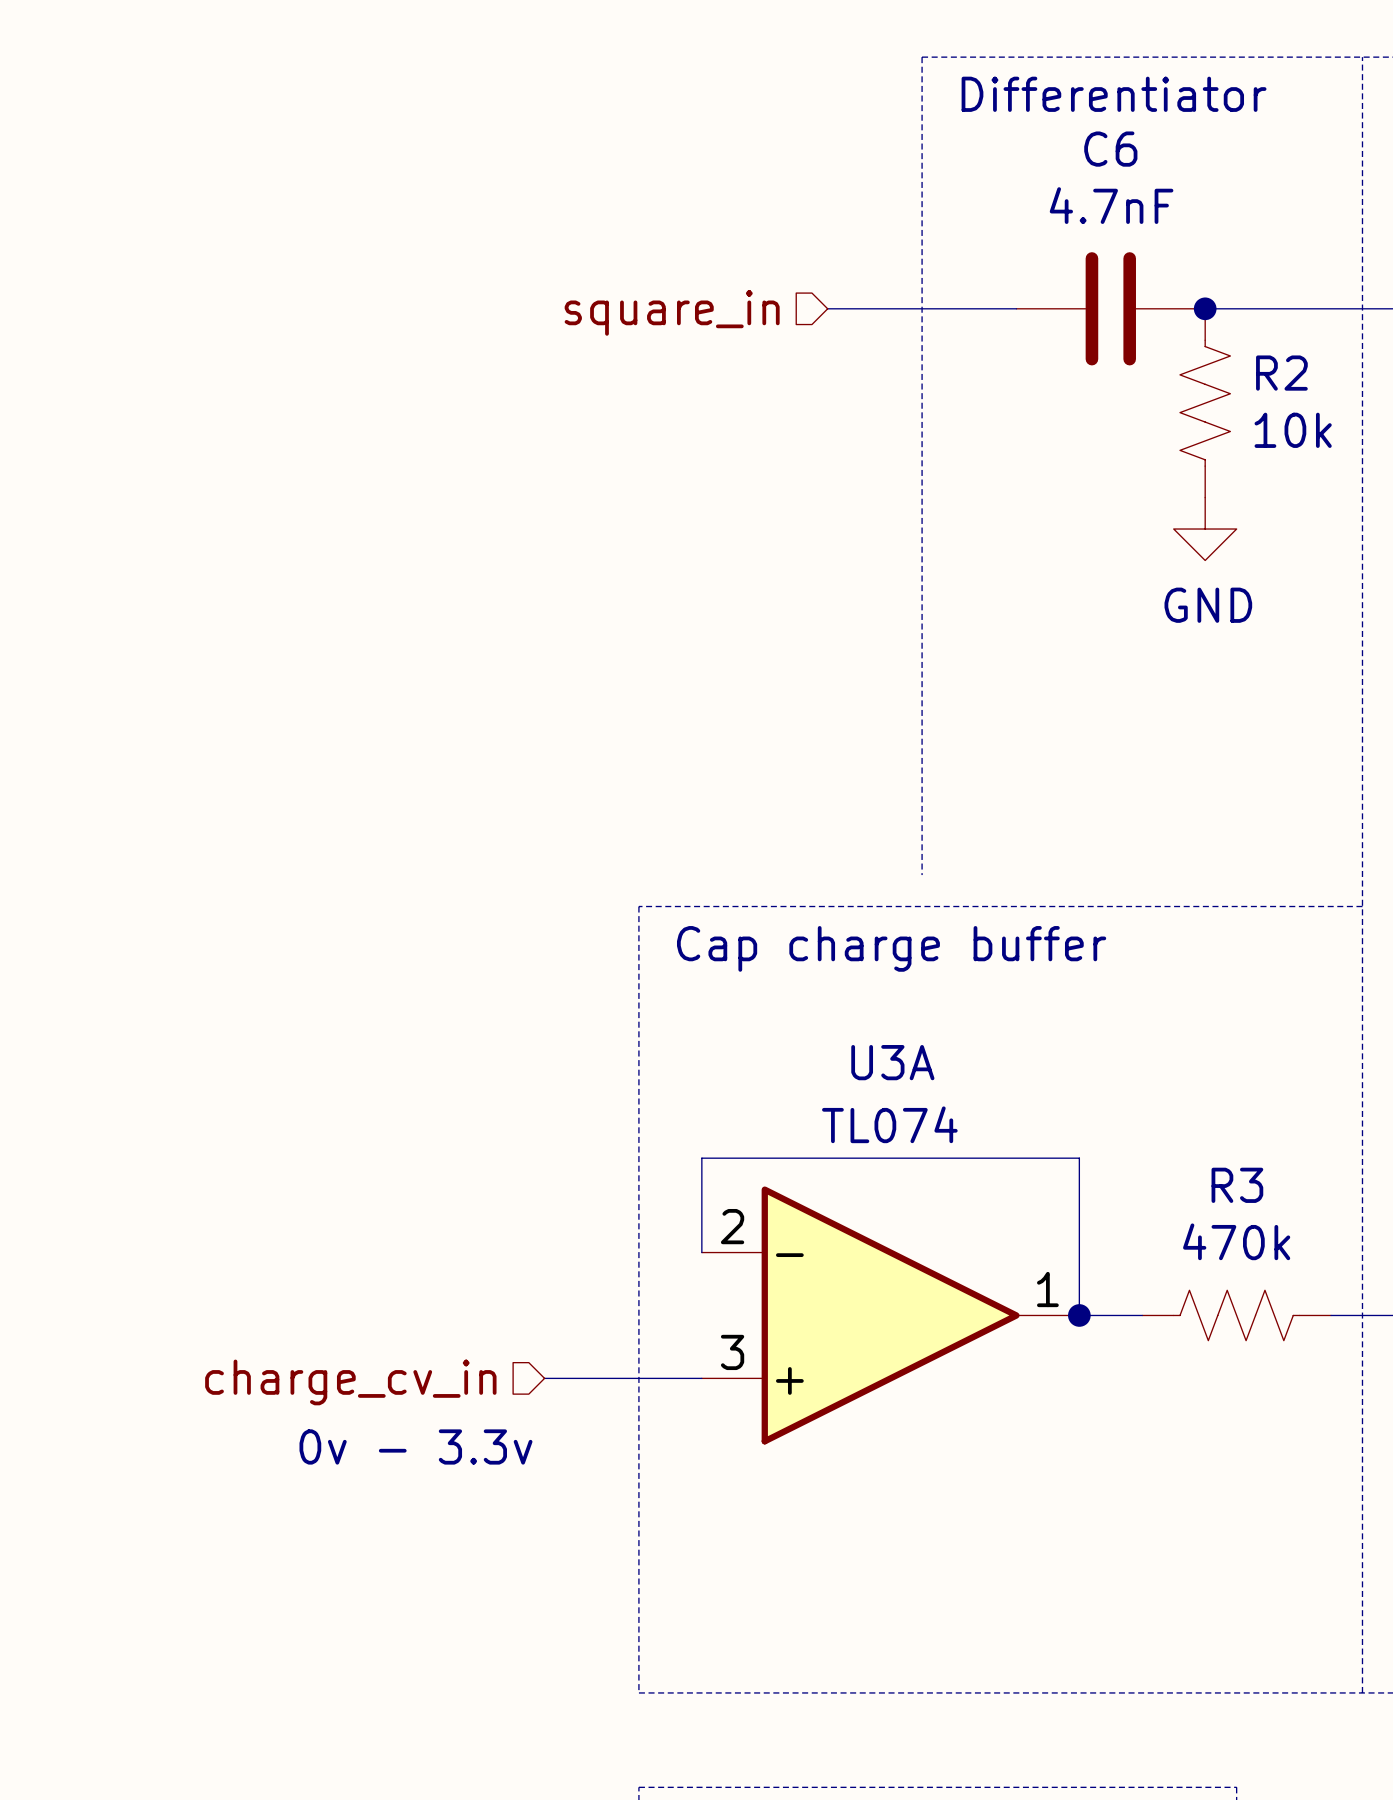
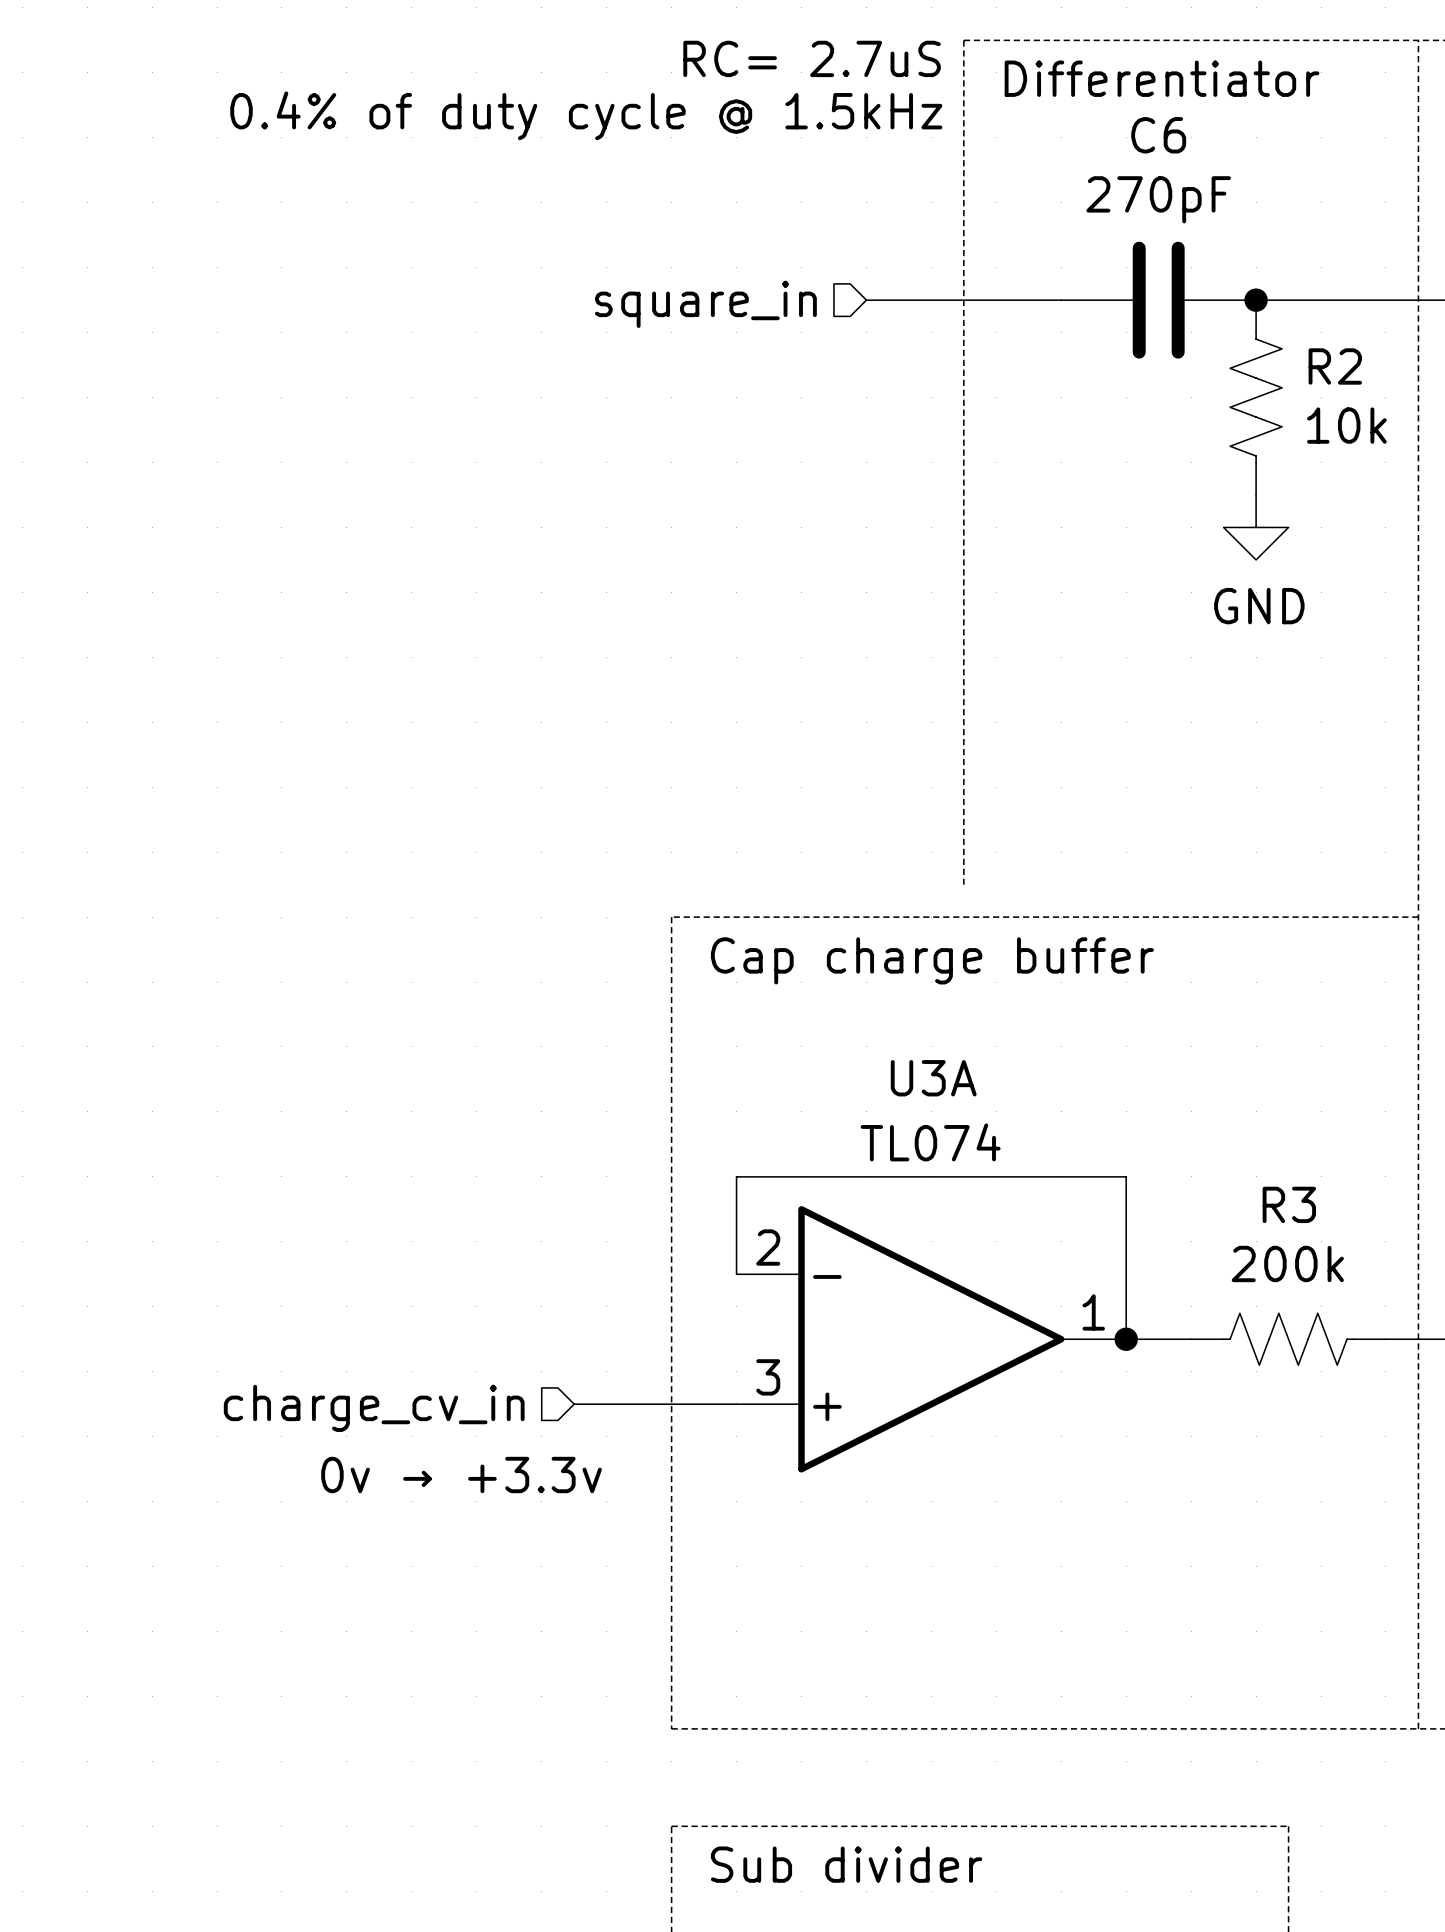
text: none -> RC= 2.7uS (812, 58)
text: none -> 0.4% of duty cycle @ 1.5kHz (586, 115)
C6 value: 4.7nF (1111, 205) -> 270pF (1158, 199)
R3 value: 470k (1236, 1241) -> 200k (1287, 1263)
text: 0v - 3.3v (415, 1446) -> 0v → +3.3v (461, 1474)

